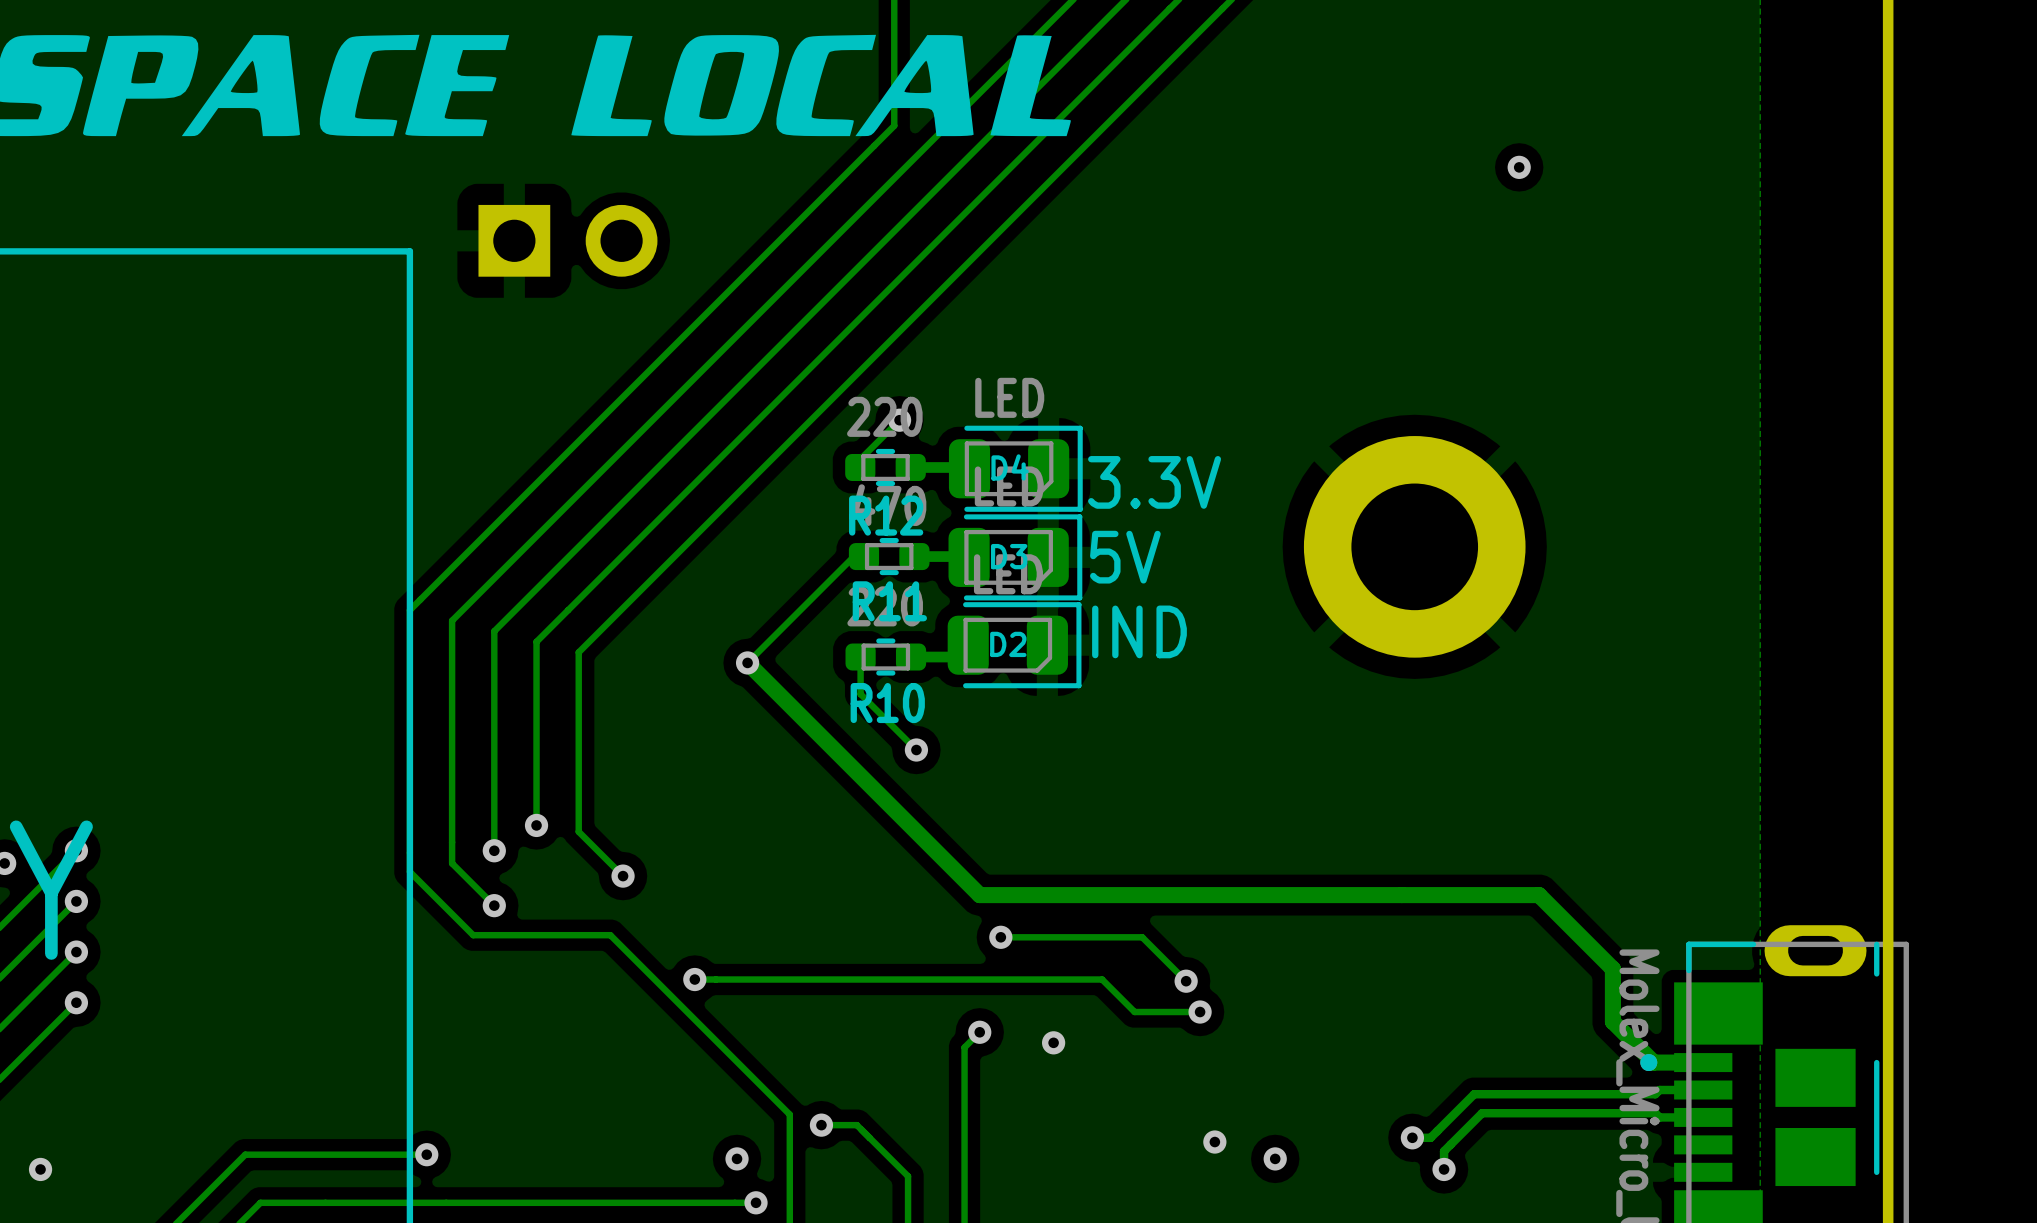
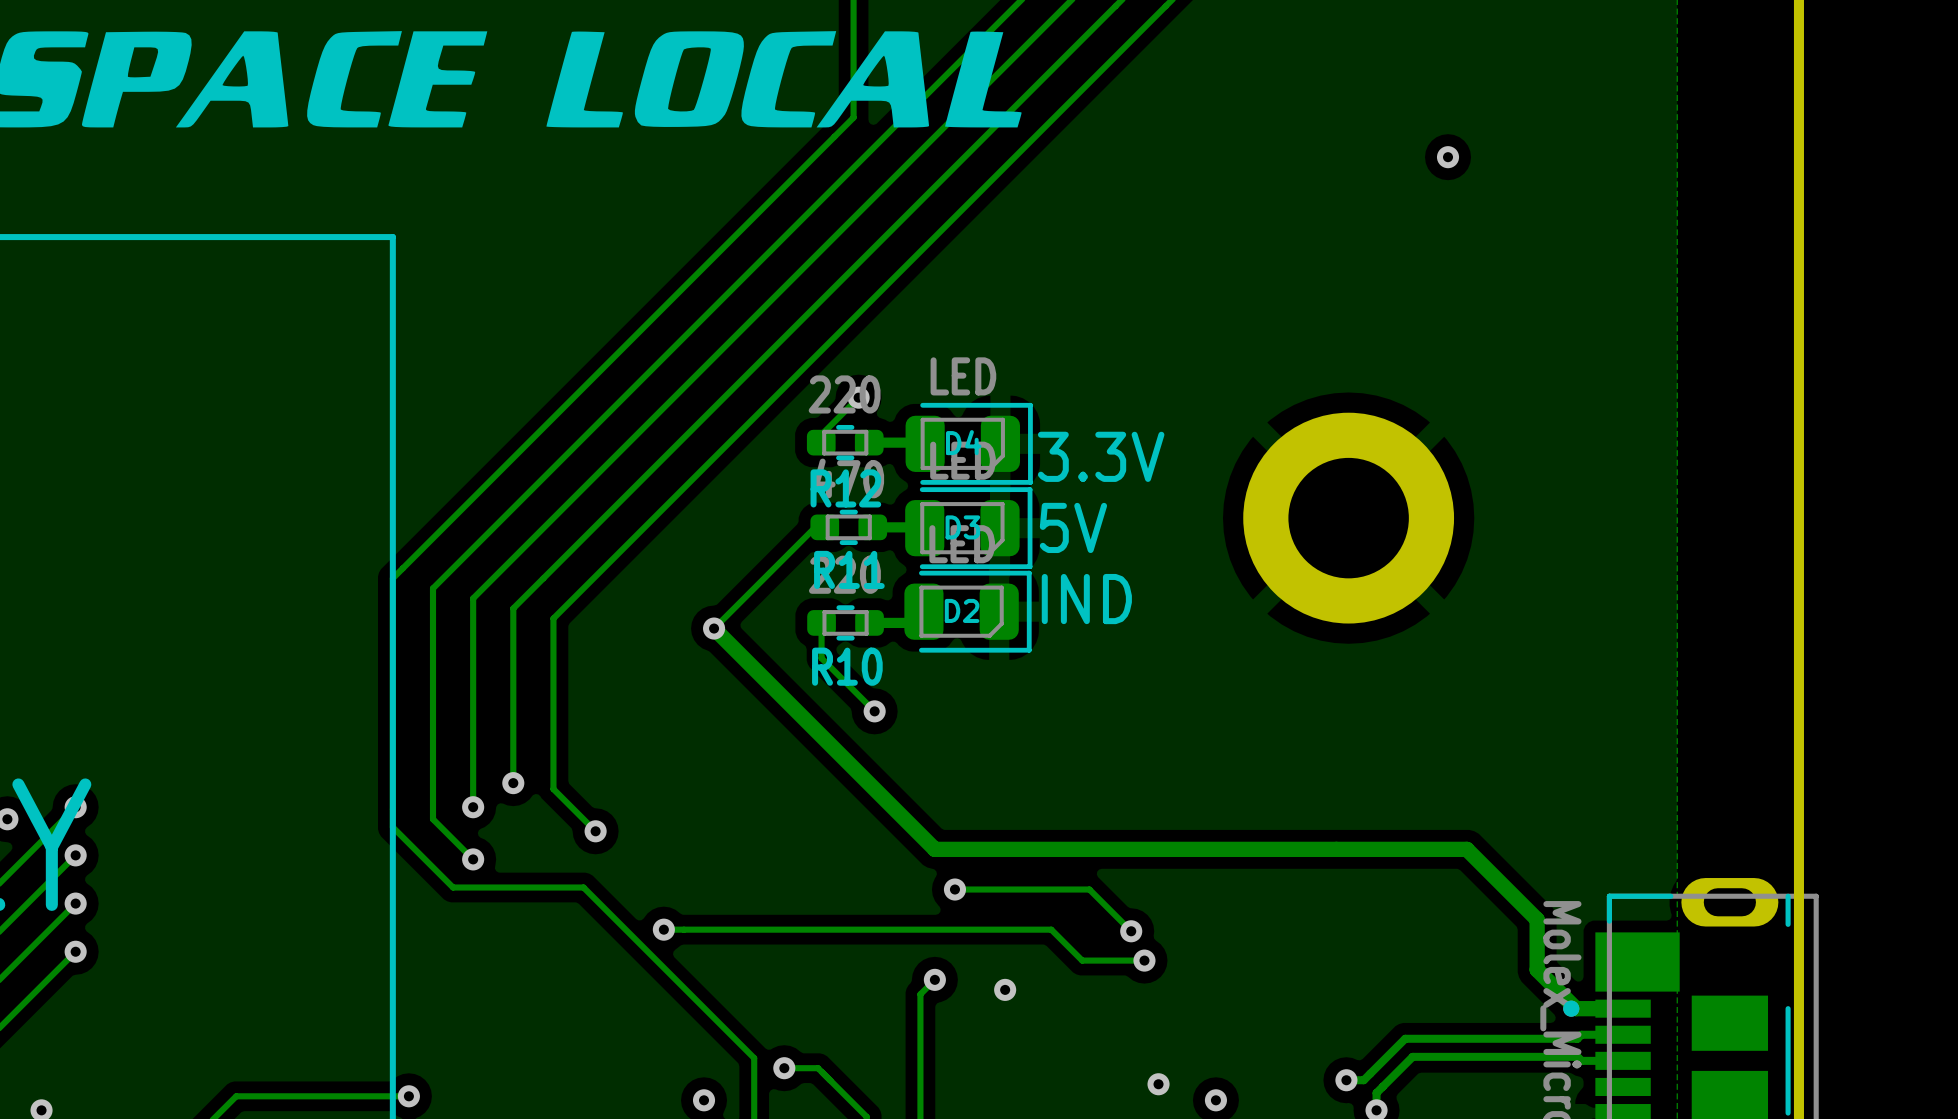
part: (567, 240) -> none

